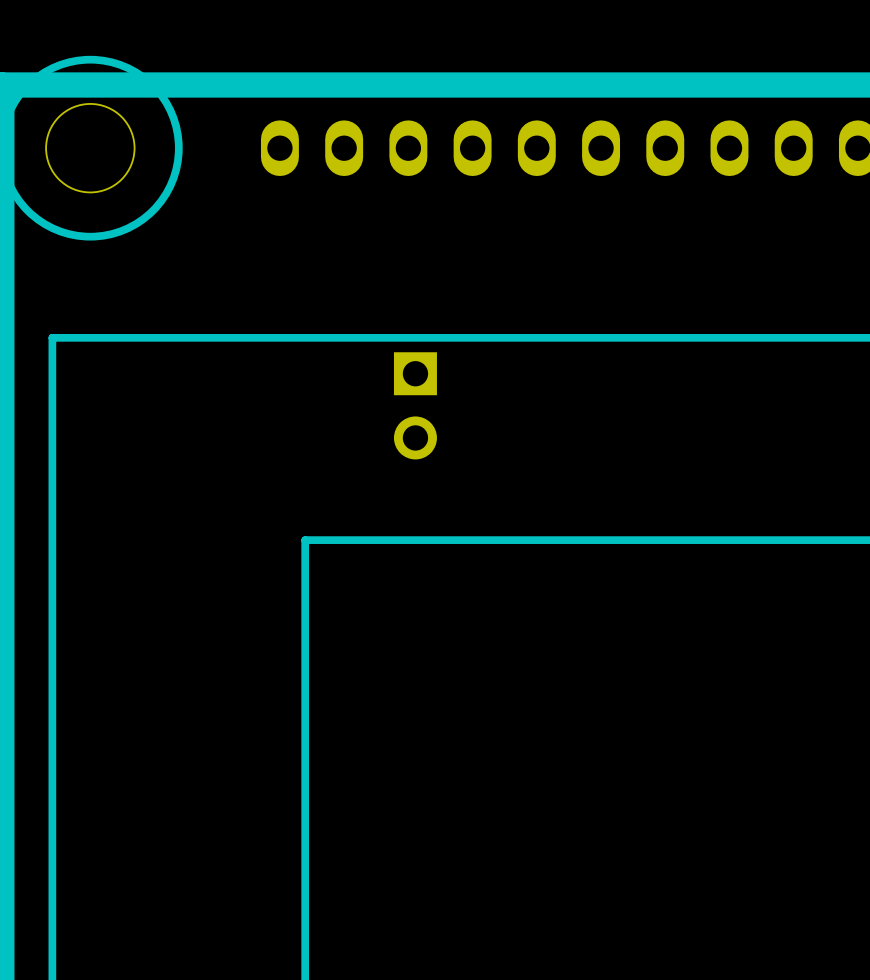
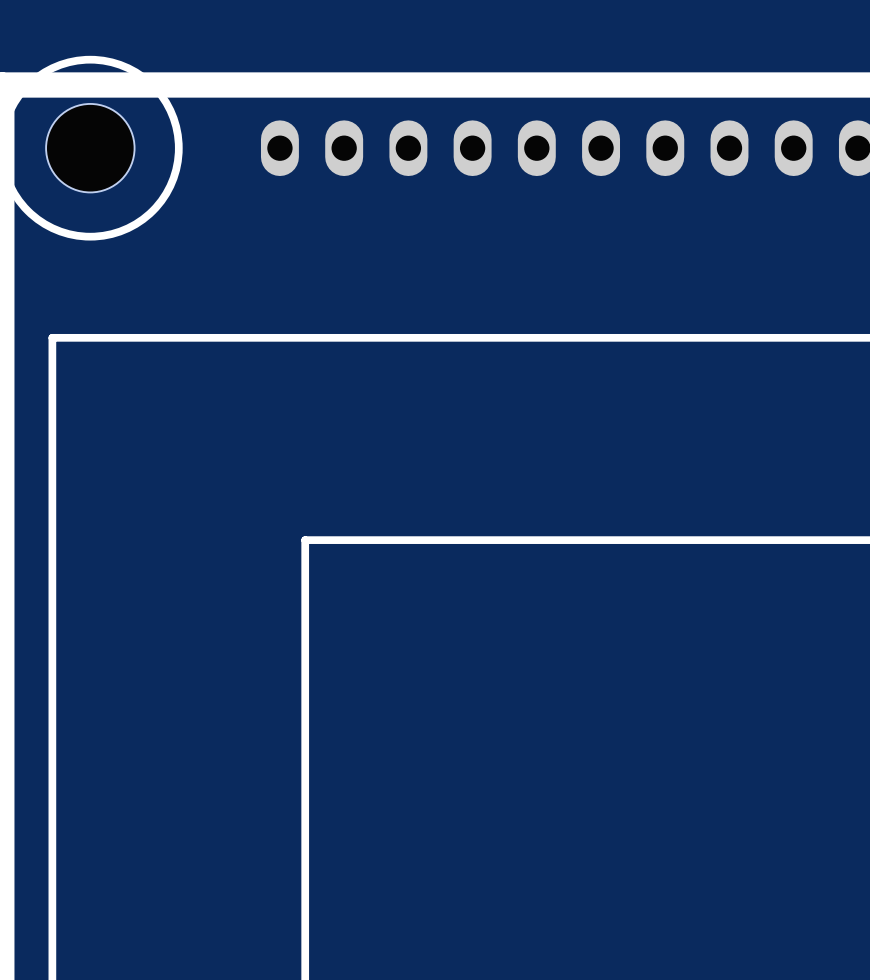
part: (415, 405) -> none

